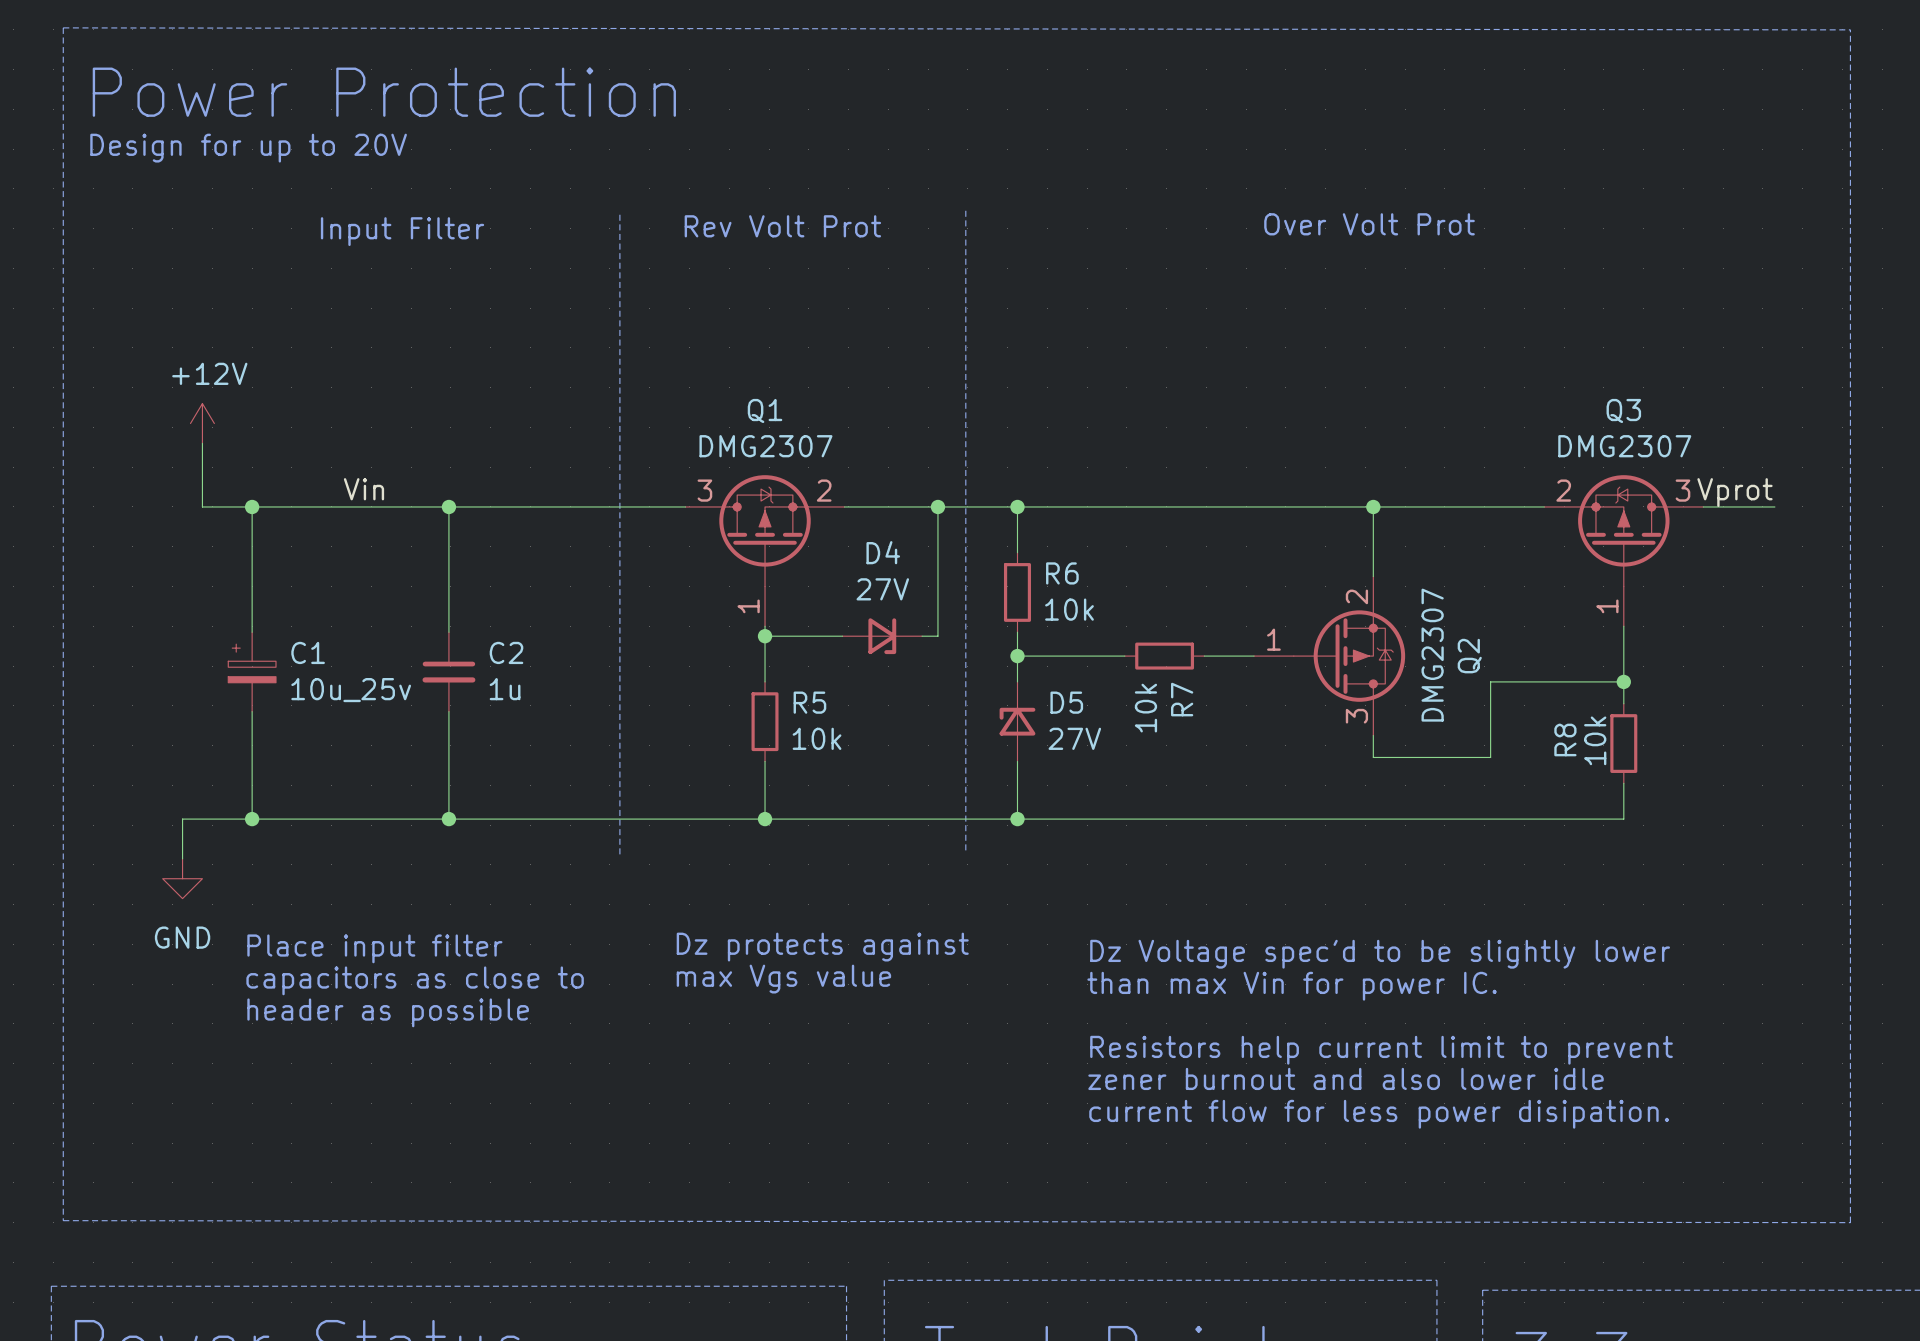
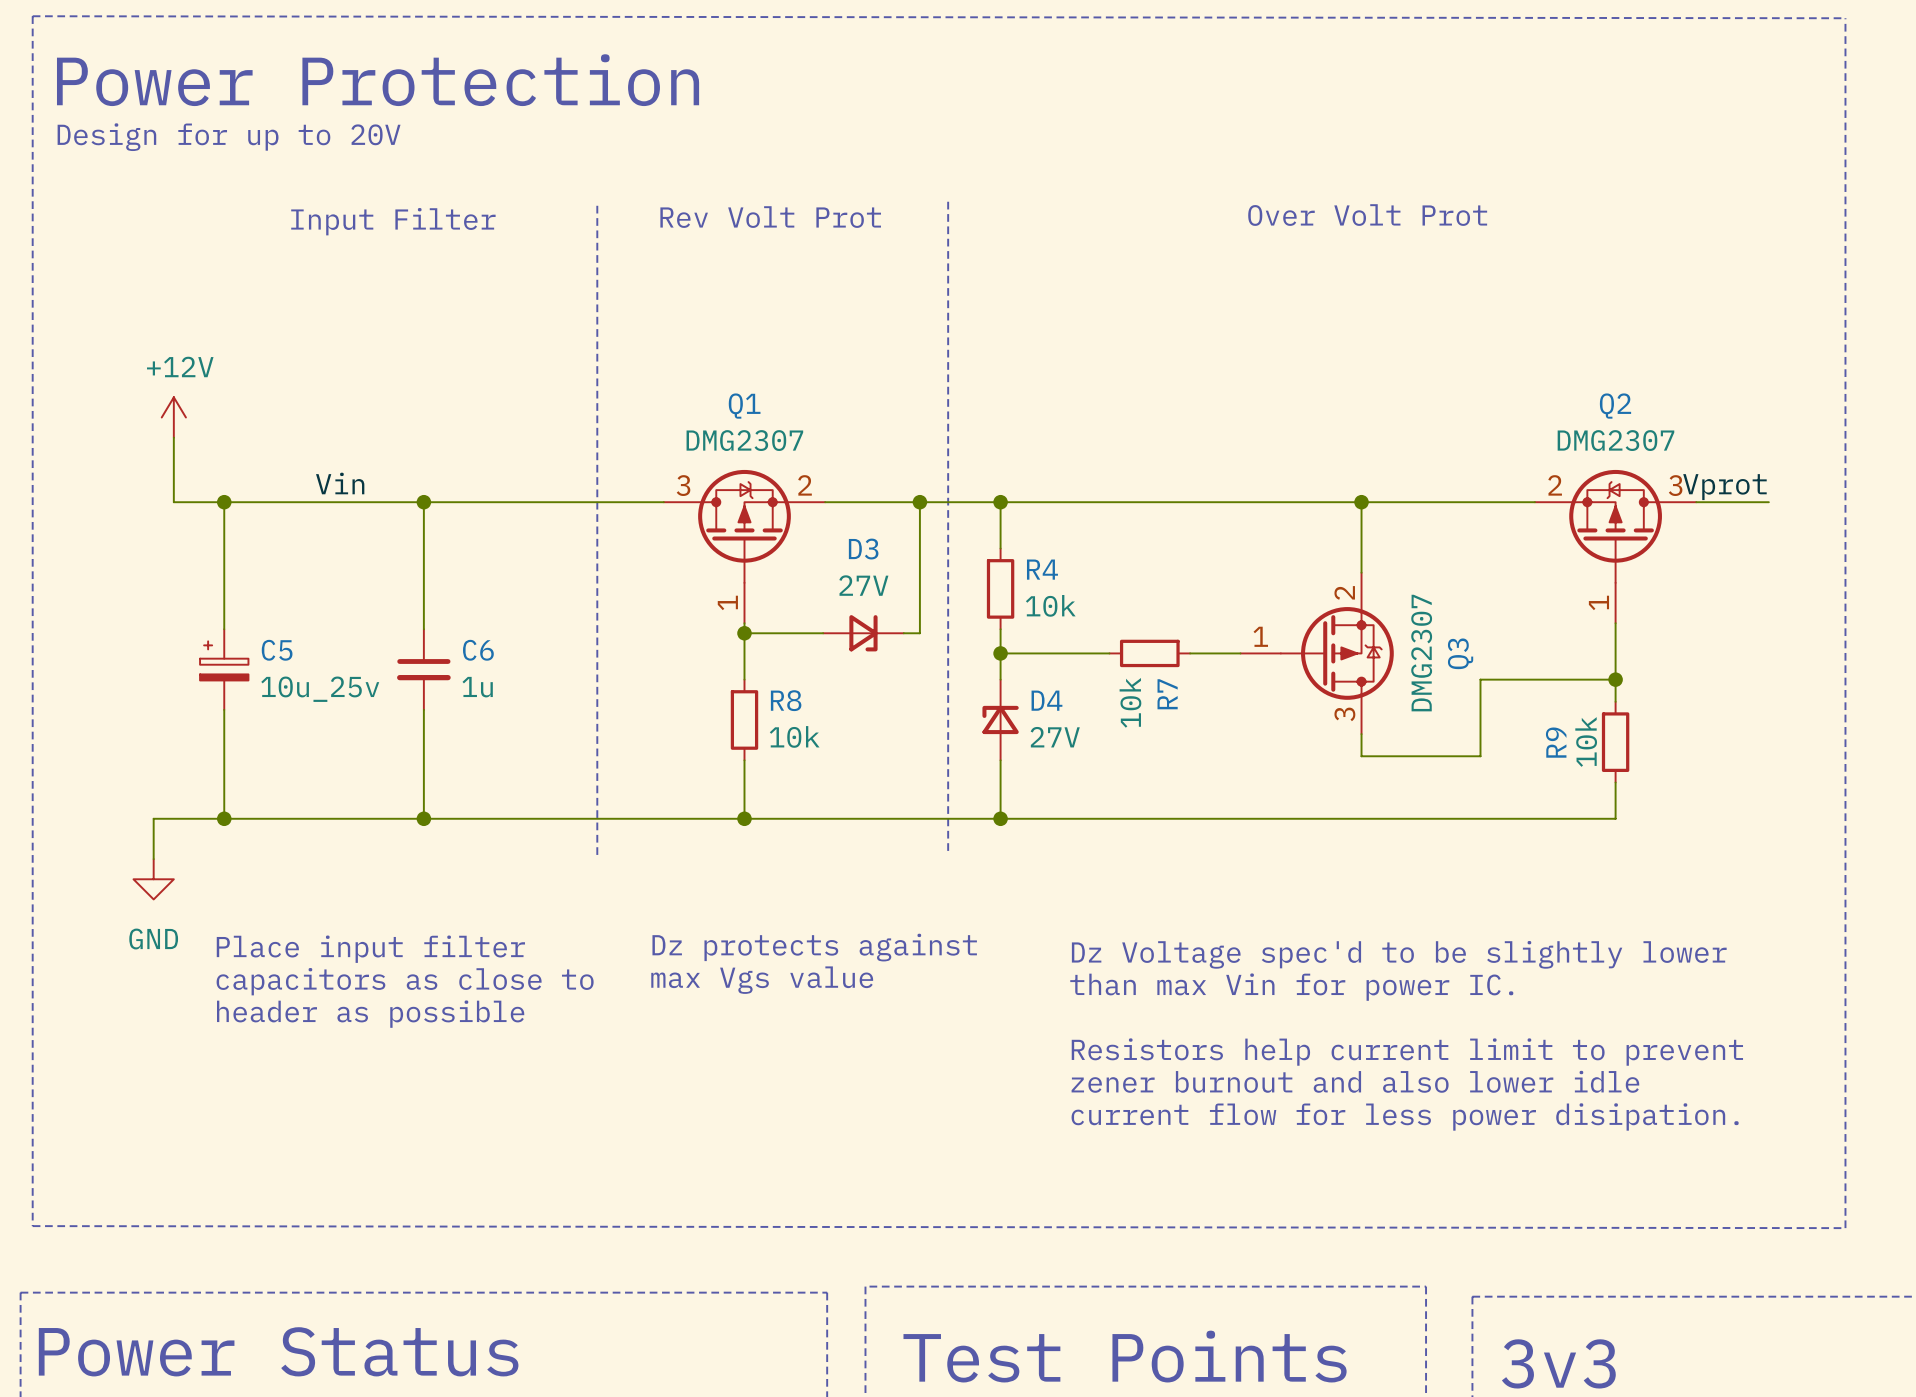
Q3 name: Q3 (1623, 410) -> Q2 (1615, 406)
D4 name: D4 (883, 552) -> D3 (863, 549)
R6 name: R6 (1062, 573) -> R4 (1042, 569)
C1 name: C1 (308, 652) -> C5 (277, 650)
C2 name: C2 (506, 652) -> C6 (478, 650)
Q2 name: Q2 (1469, 656) -> Q3 (1460, 653)
R5 name: R5 (809, 702) -> R8 (786, 700)
D5 name: D5 (1066, 702) -> D4 (1046, 700)
R8 name: R8 (1565, 739) -> R9 (1556, 742)

